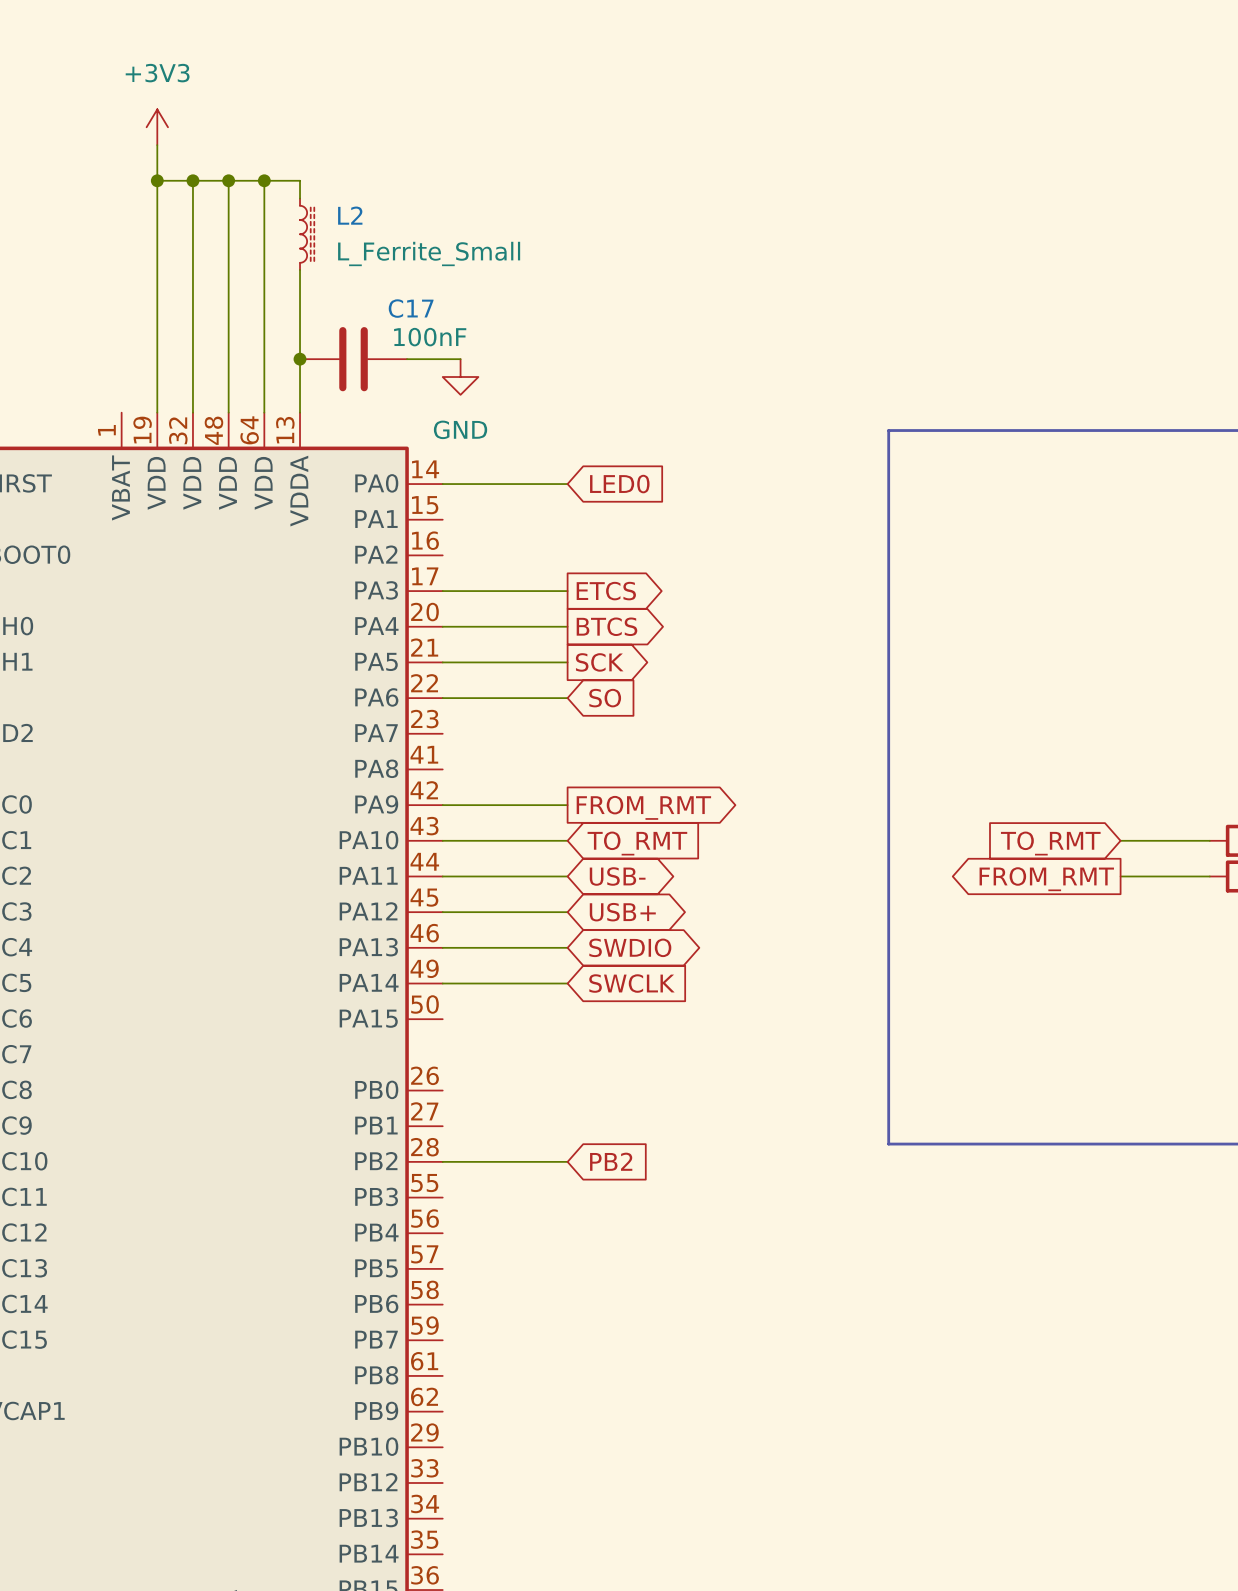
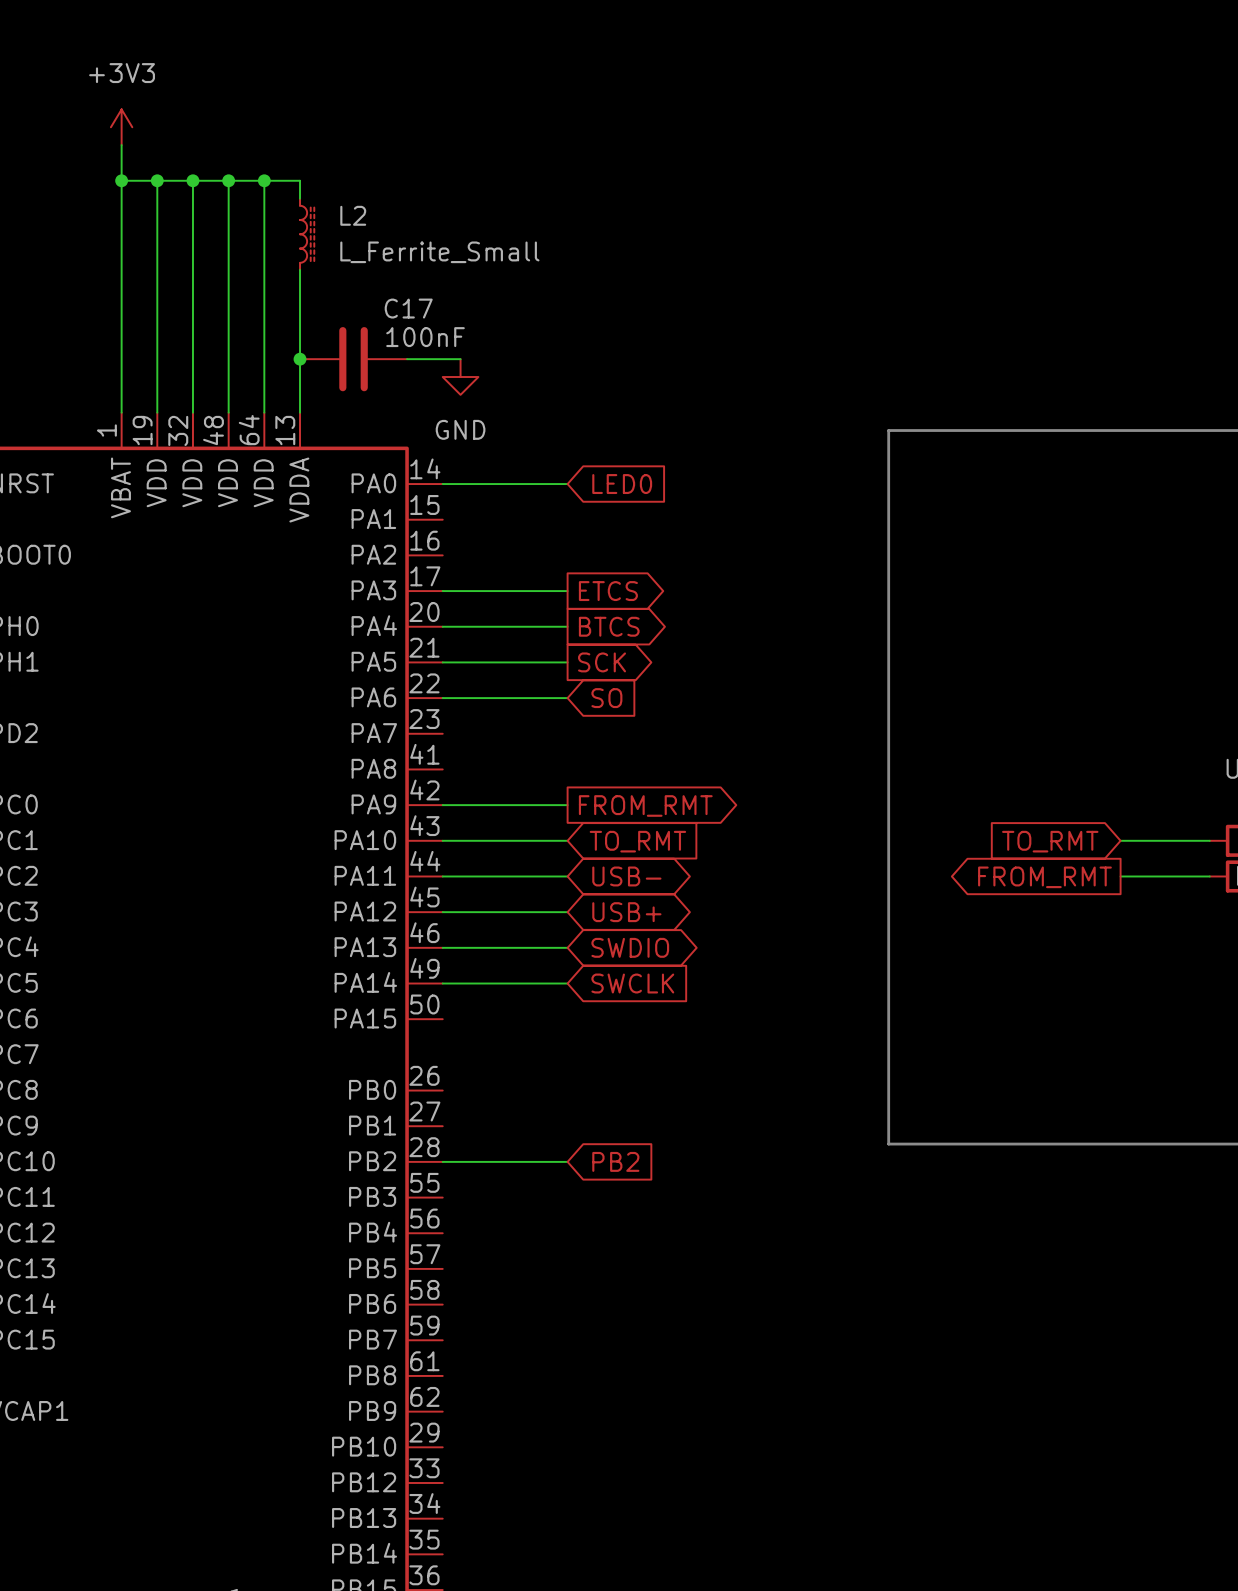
power symbol position: +3V3 (157, 127) -> +3V3 (121, 127)
wire: none -> (121, 145) (121, 412)
wire: (157, 145) (157, 180) -> (121, 180) (157, 180)
junction: none -> (121, 180)

